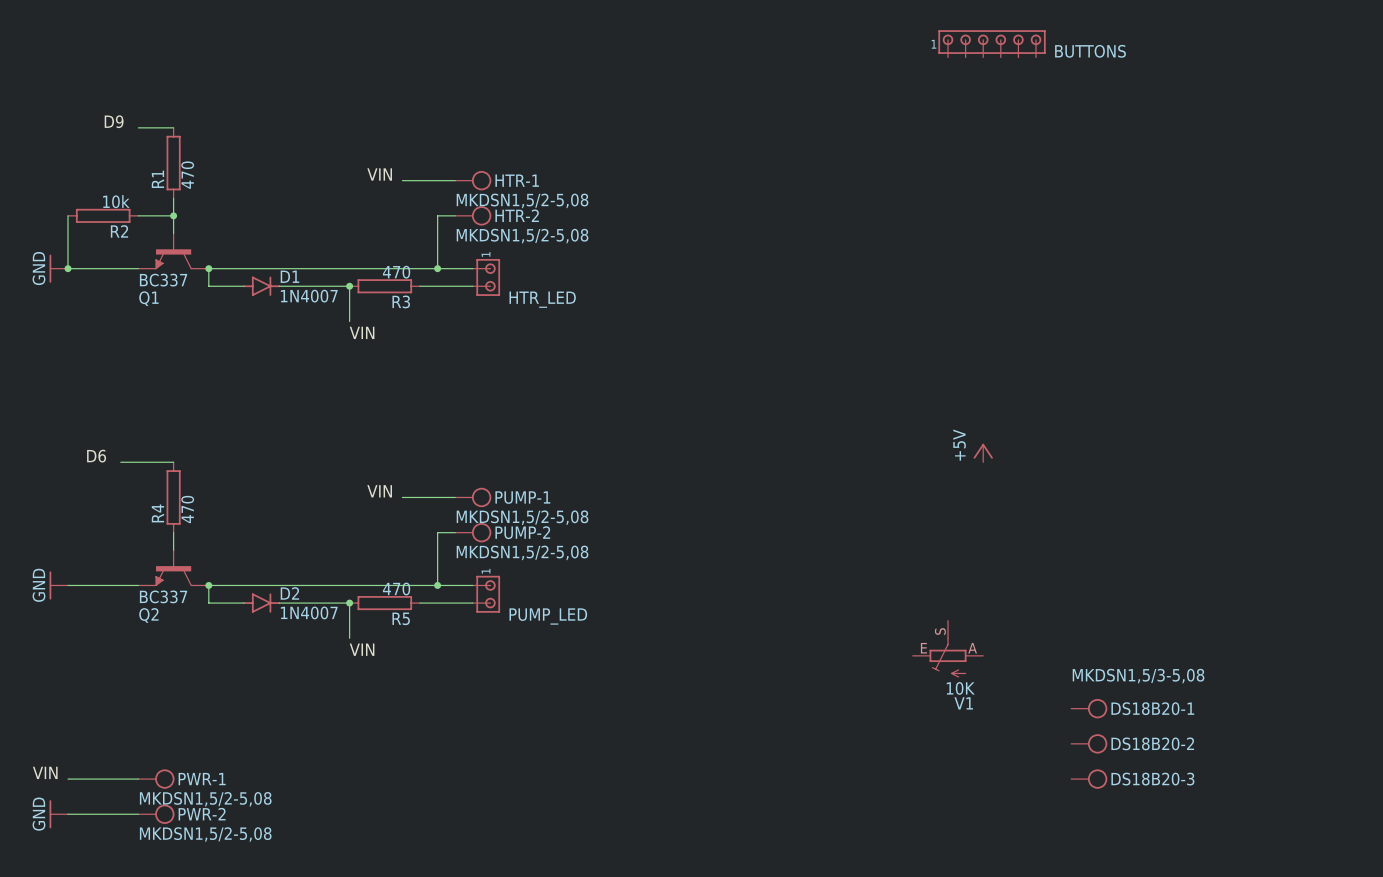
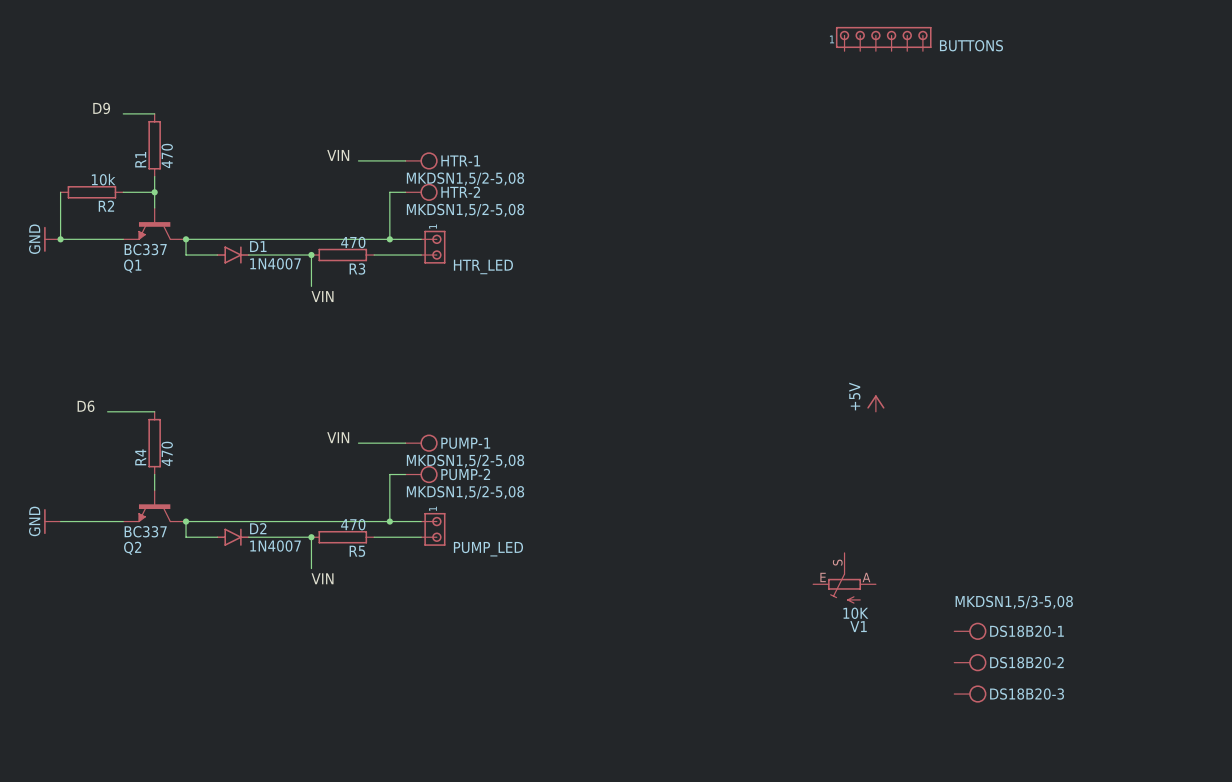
label: VIN (45, 772) -> none
wire: (68, 779) (138, 779) -> none
PWR-1: MKDSN1,5/2-5,08 (156, 779) -> none
power symbol: GND (58, 814) -> none
wire: (68, 814) (138, 814) -> none
PWR-2: MKDSN1,5/2-5,08 (156, 814) -> none

